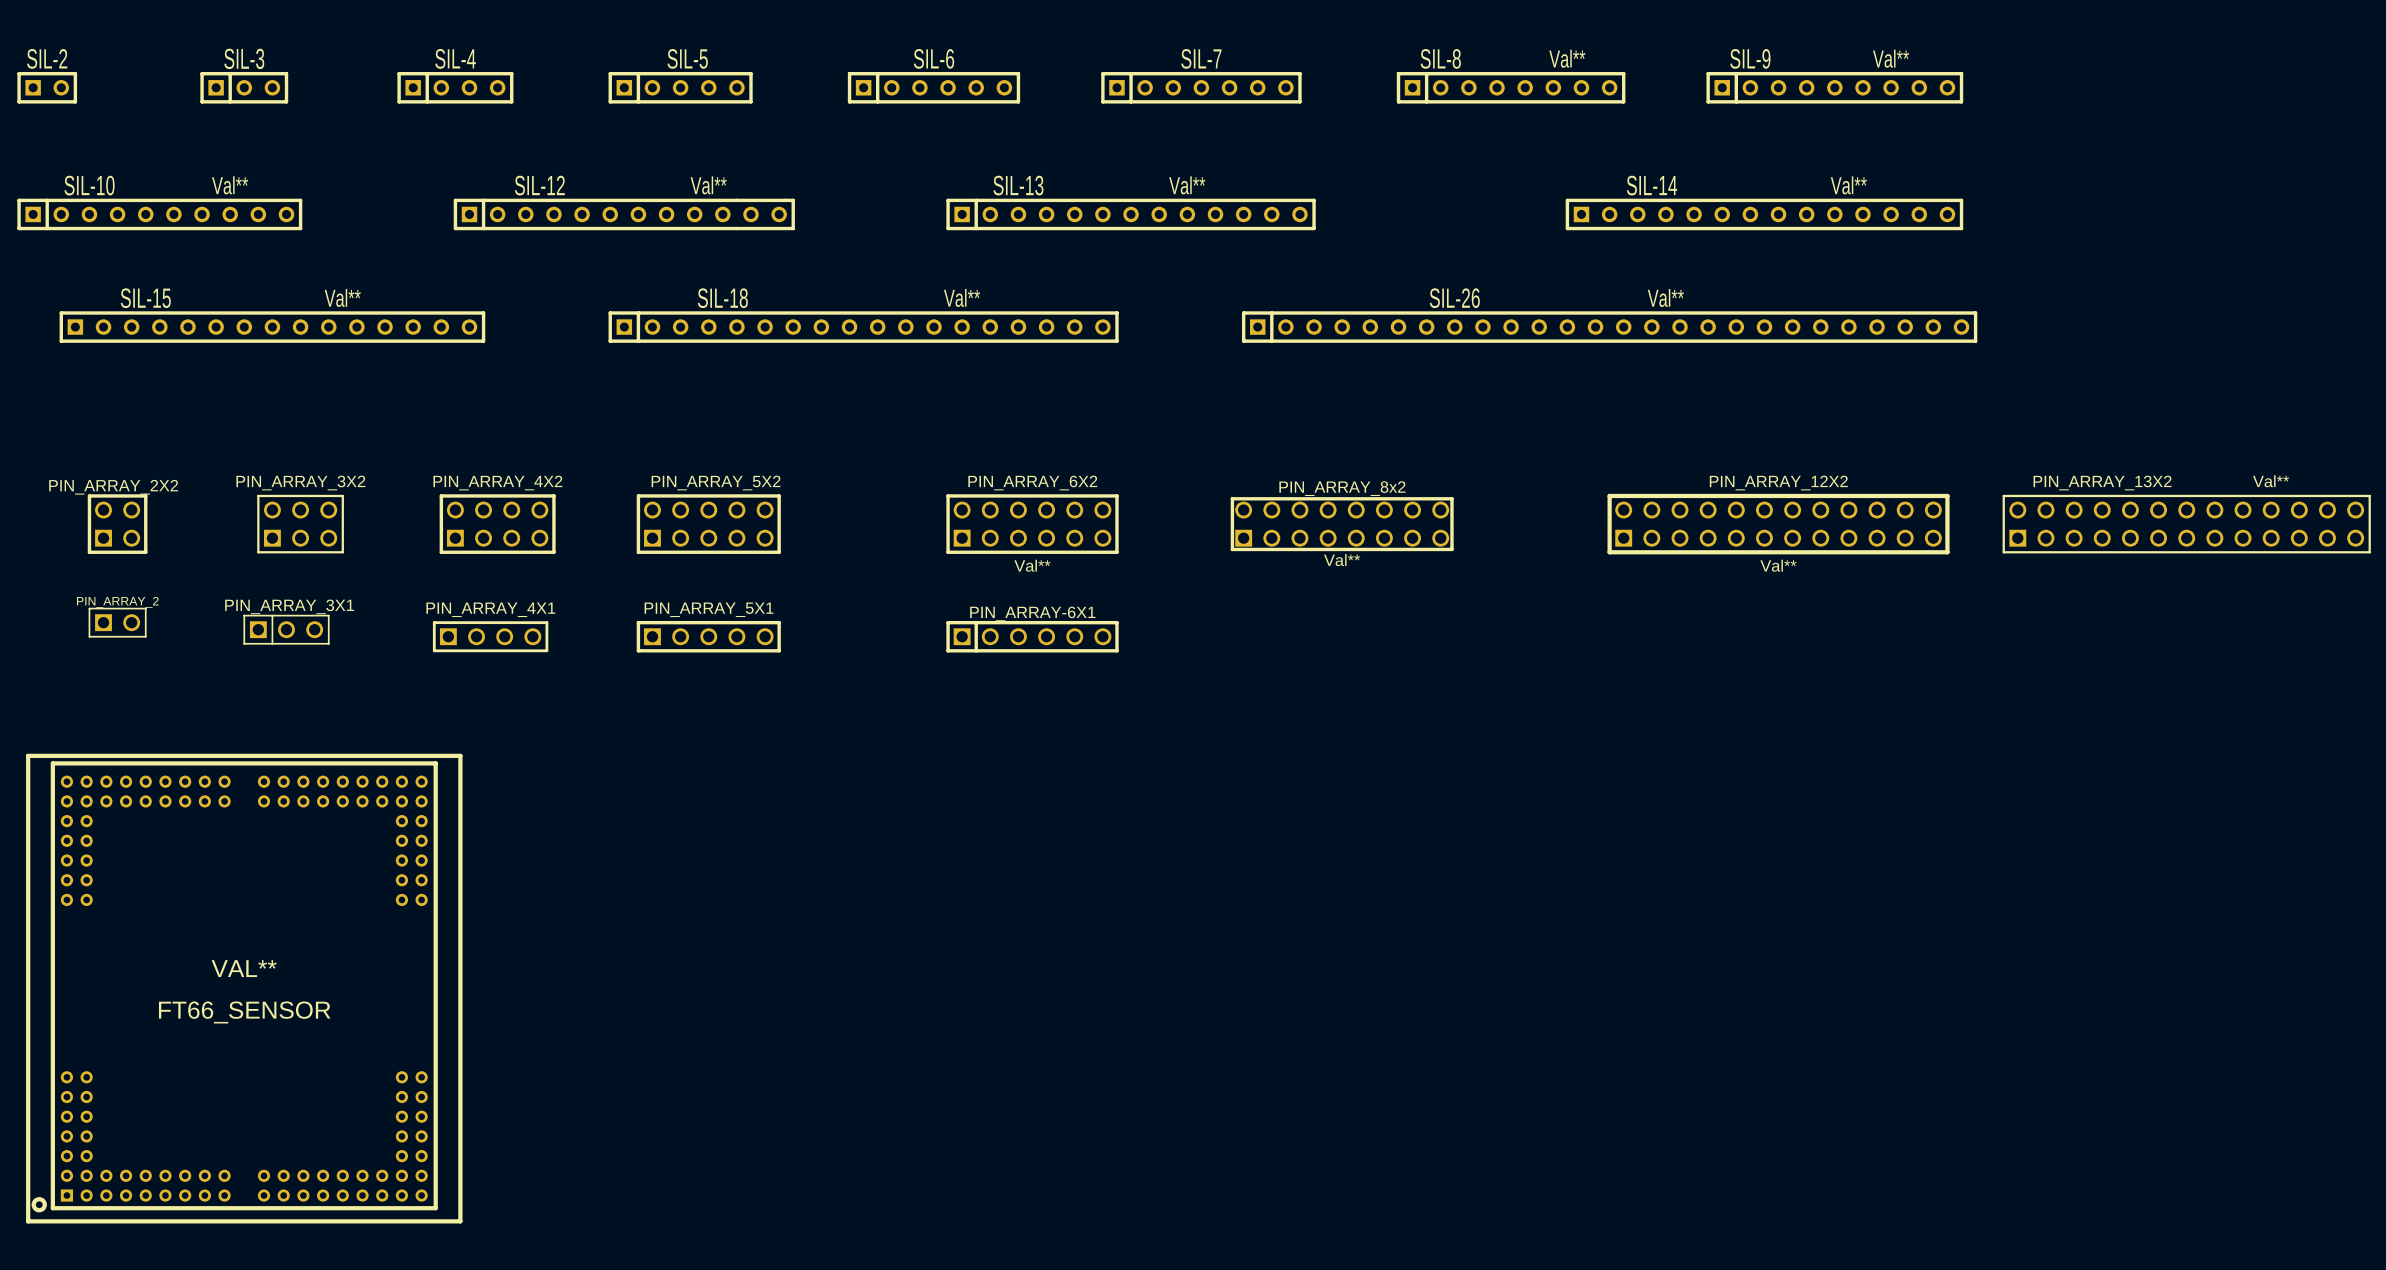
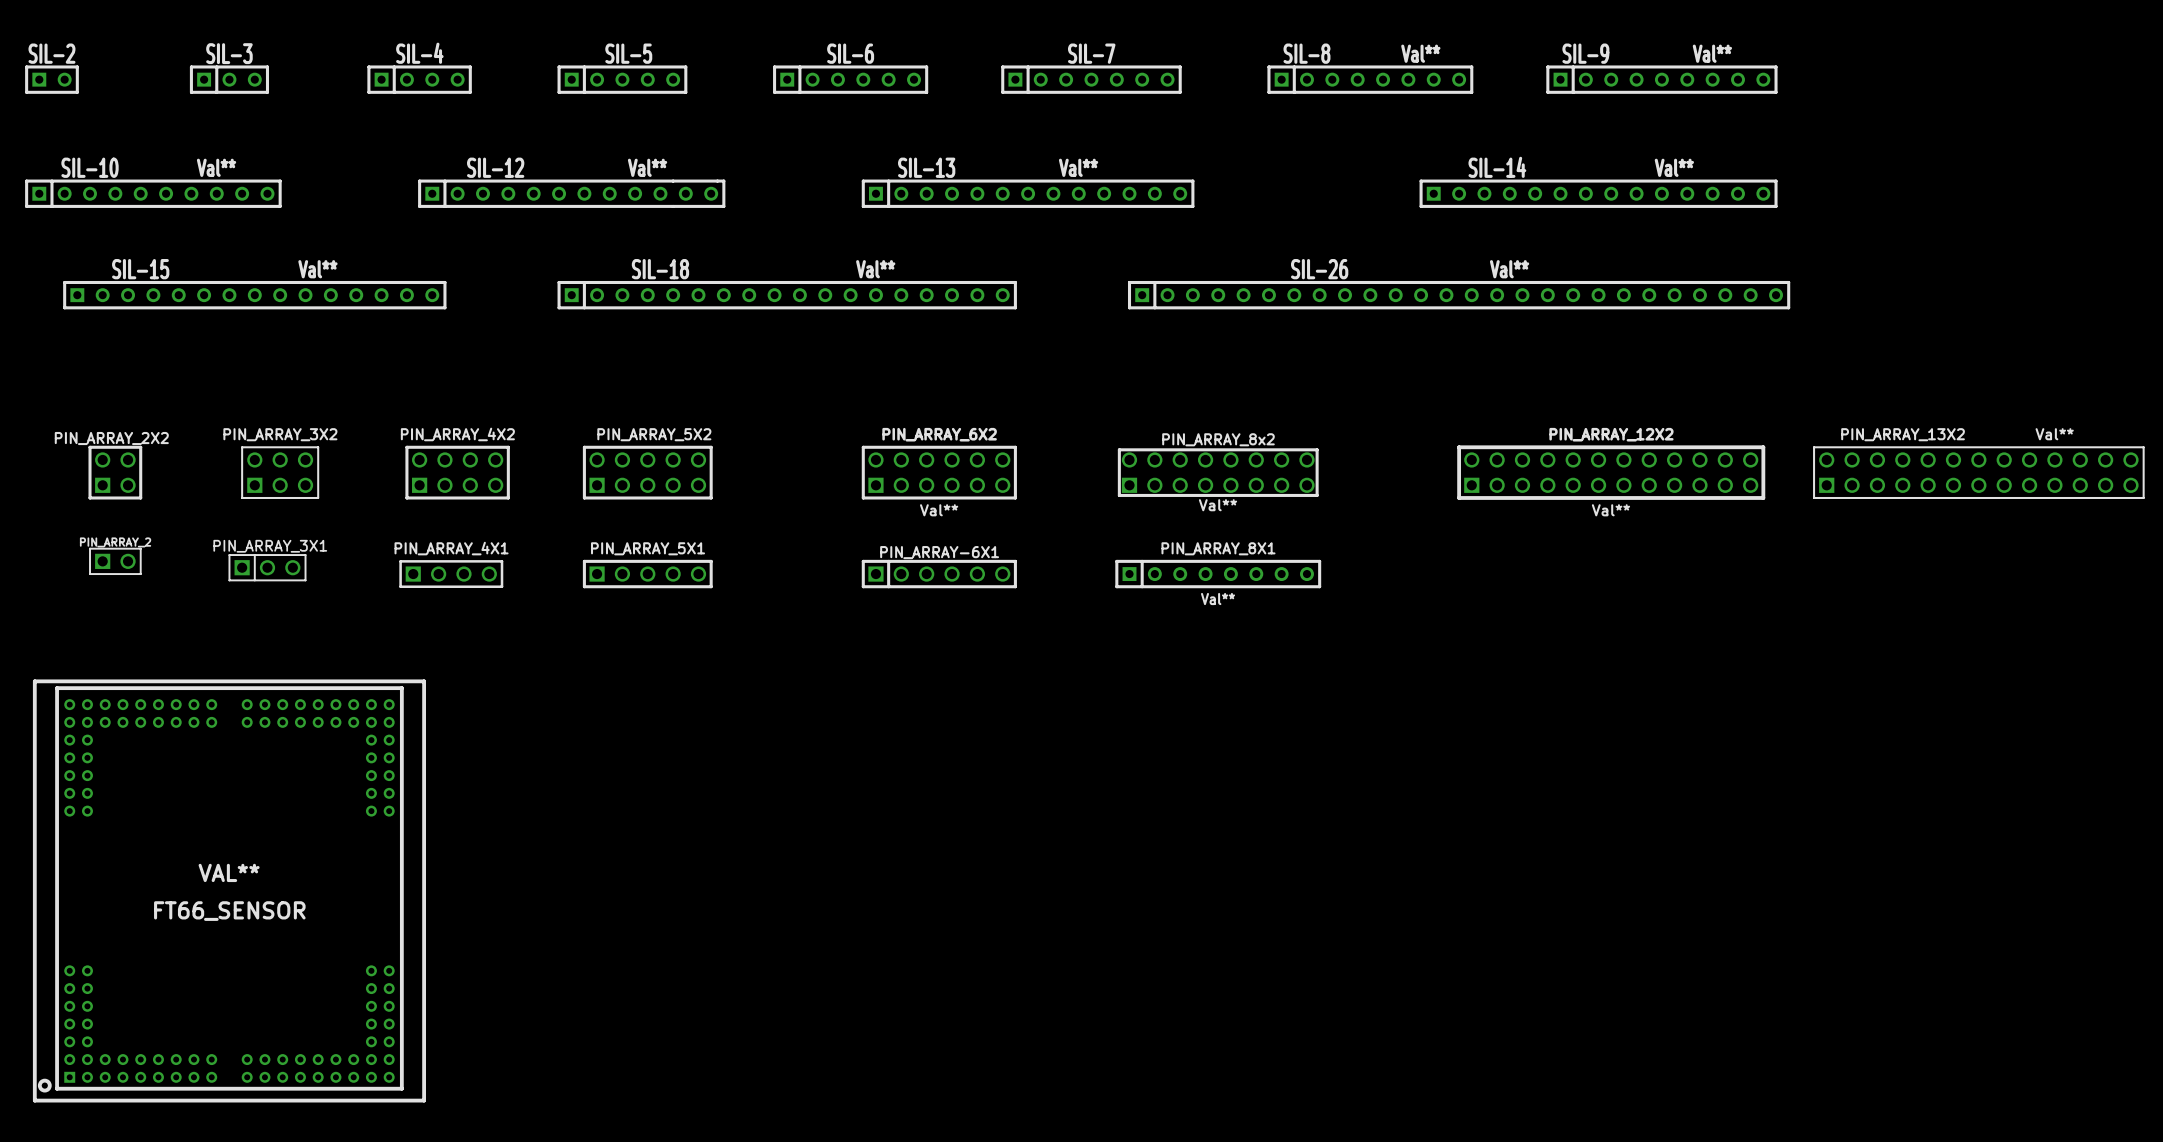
Val**: none -> PIN_ARRAY_8X1 (1218, 574)

